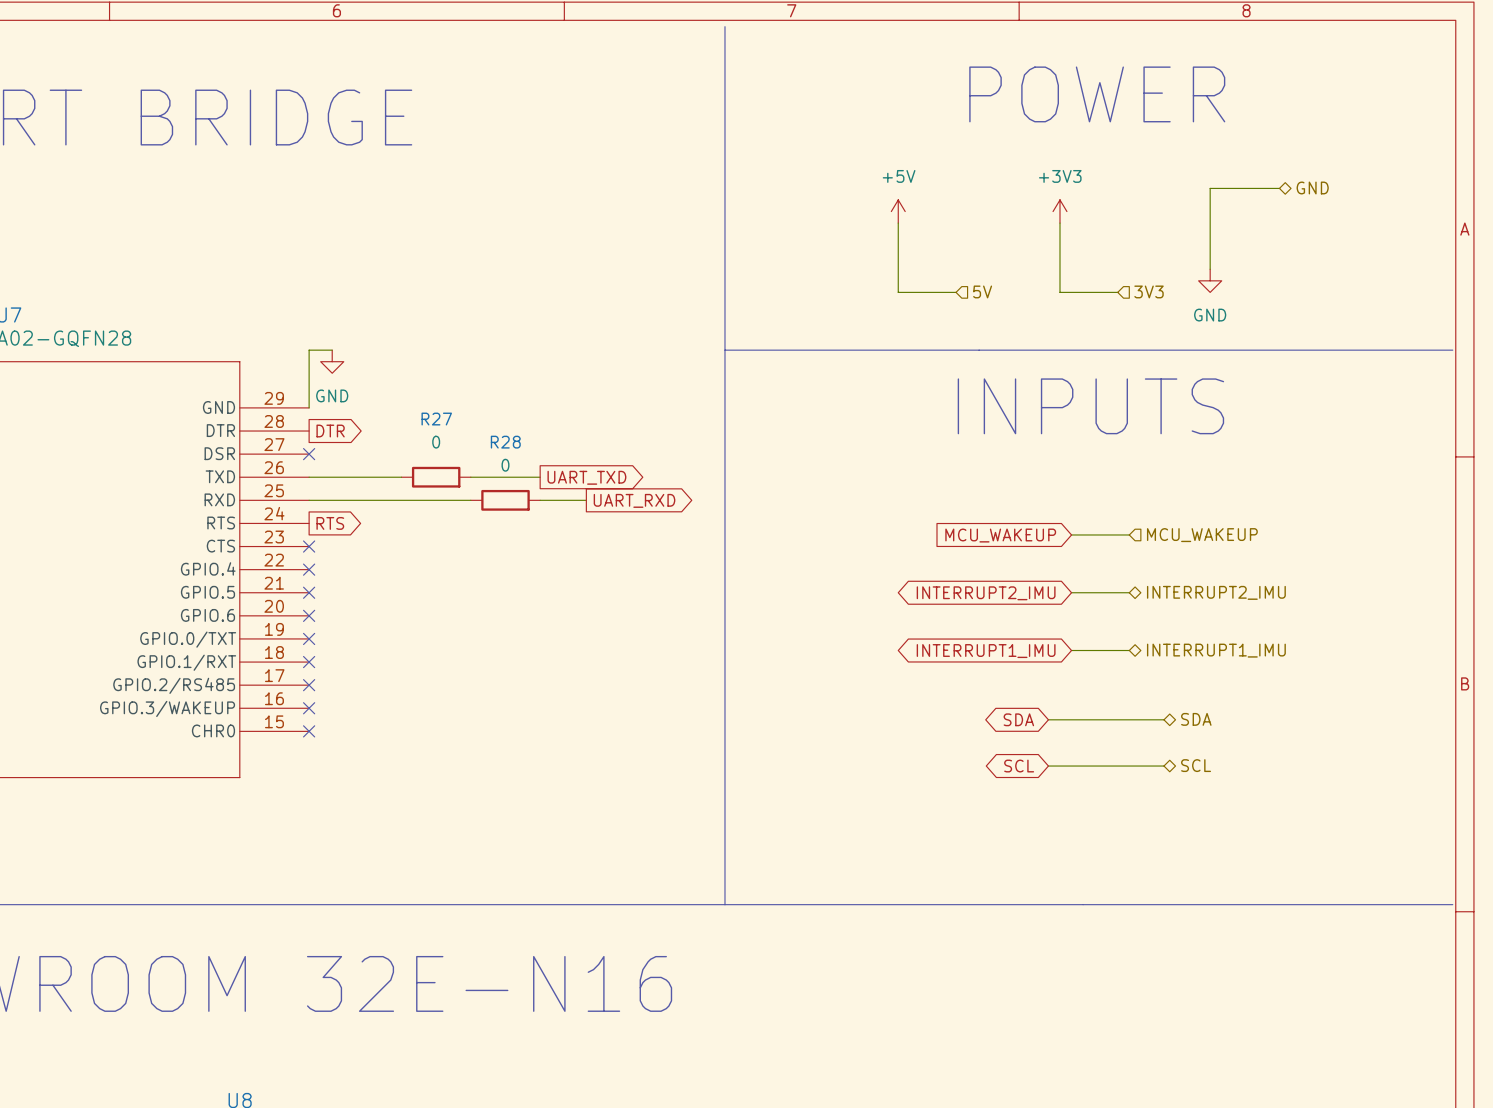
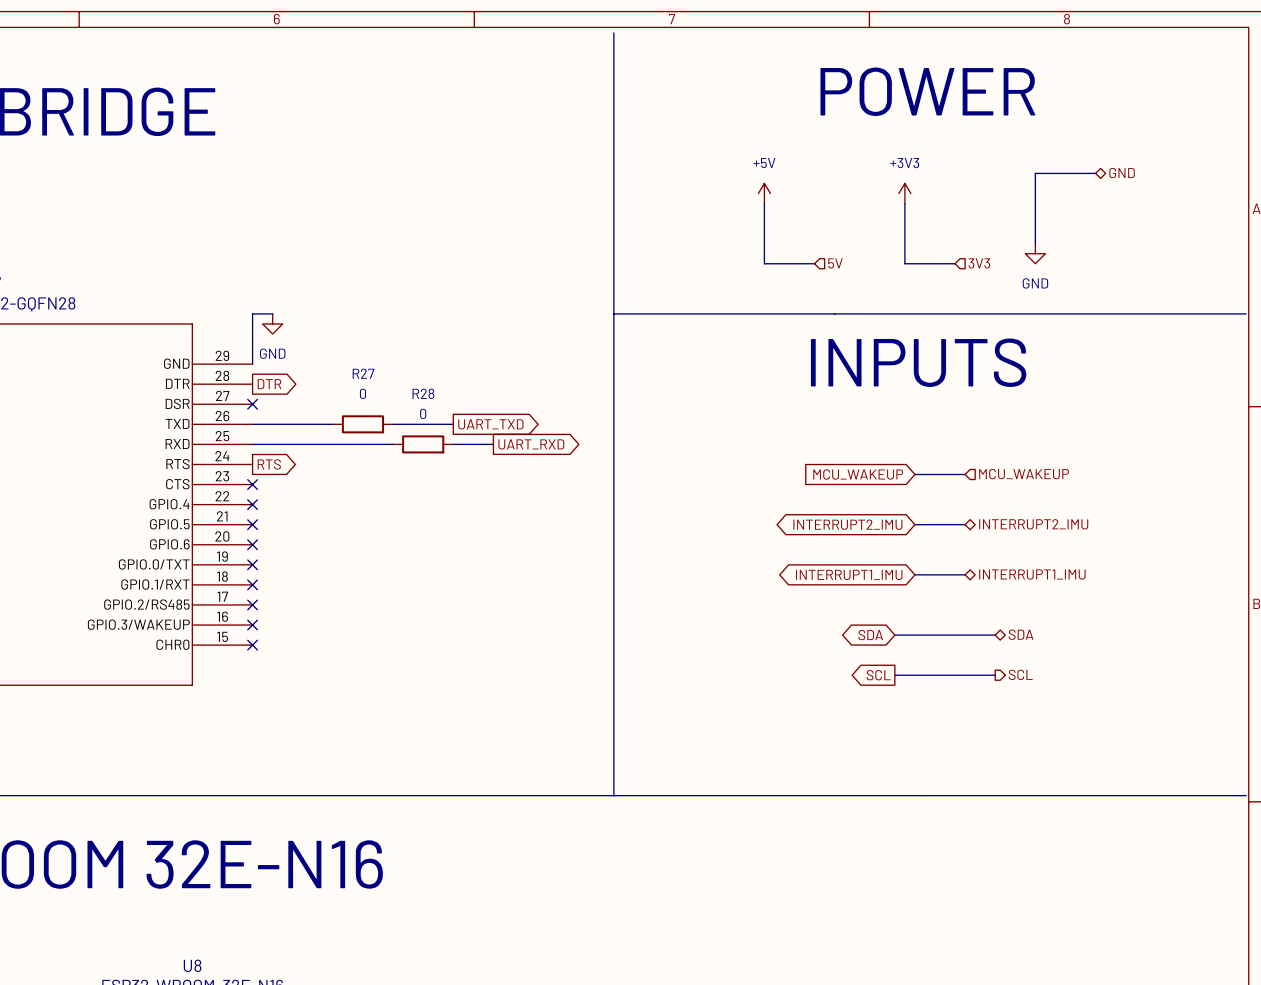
hierarchical label shape: bidirectional (1196, 765) -> output (1020, 674)
global label shape: bidirectional (1019, 766) -> output (878, 675)

